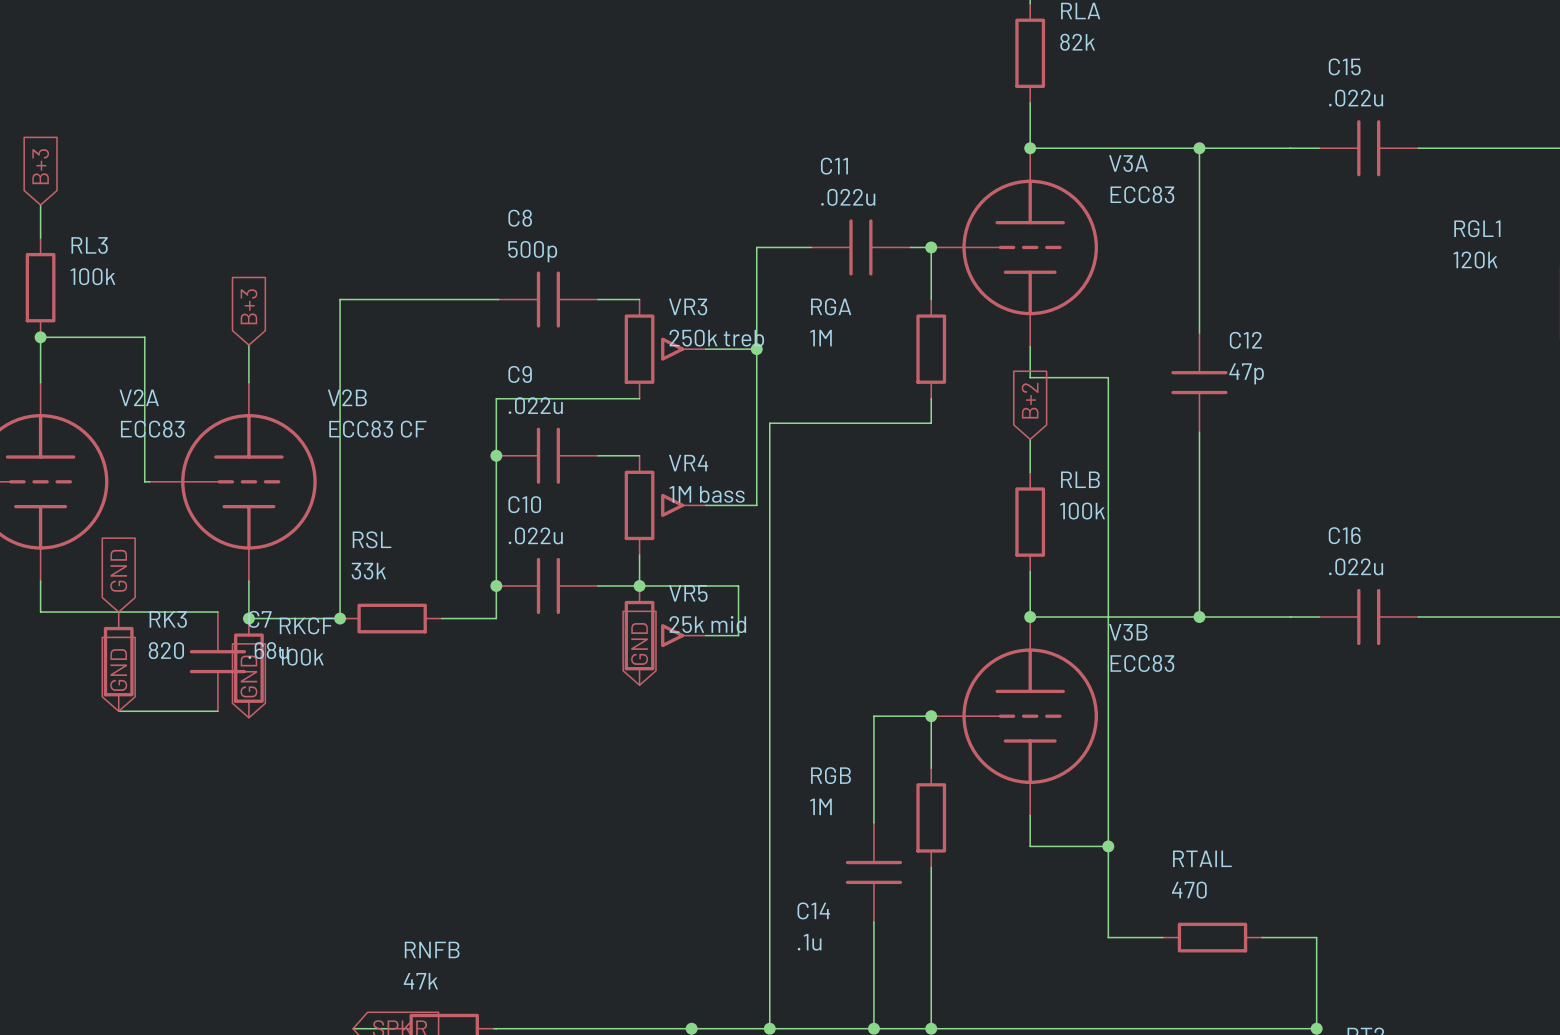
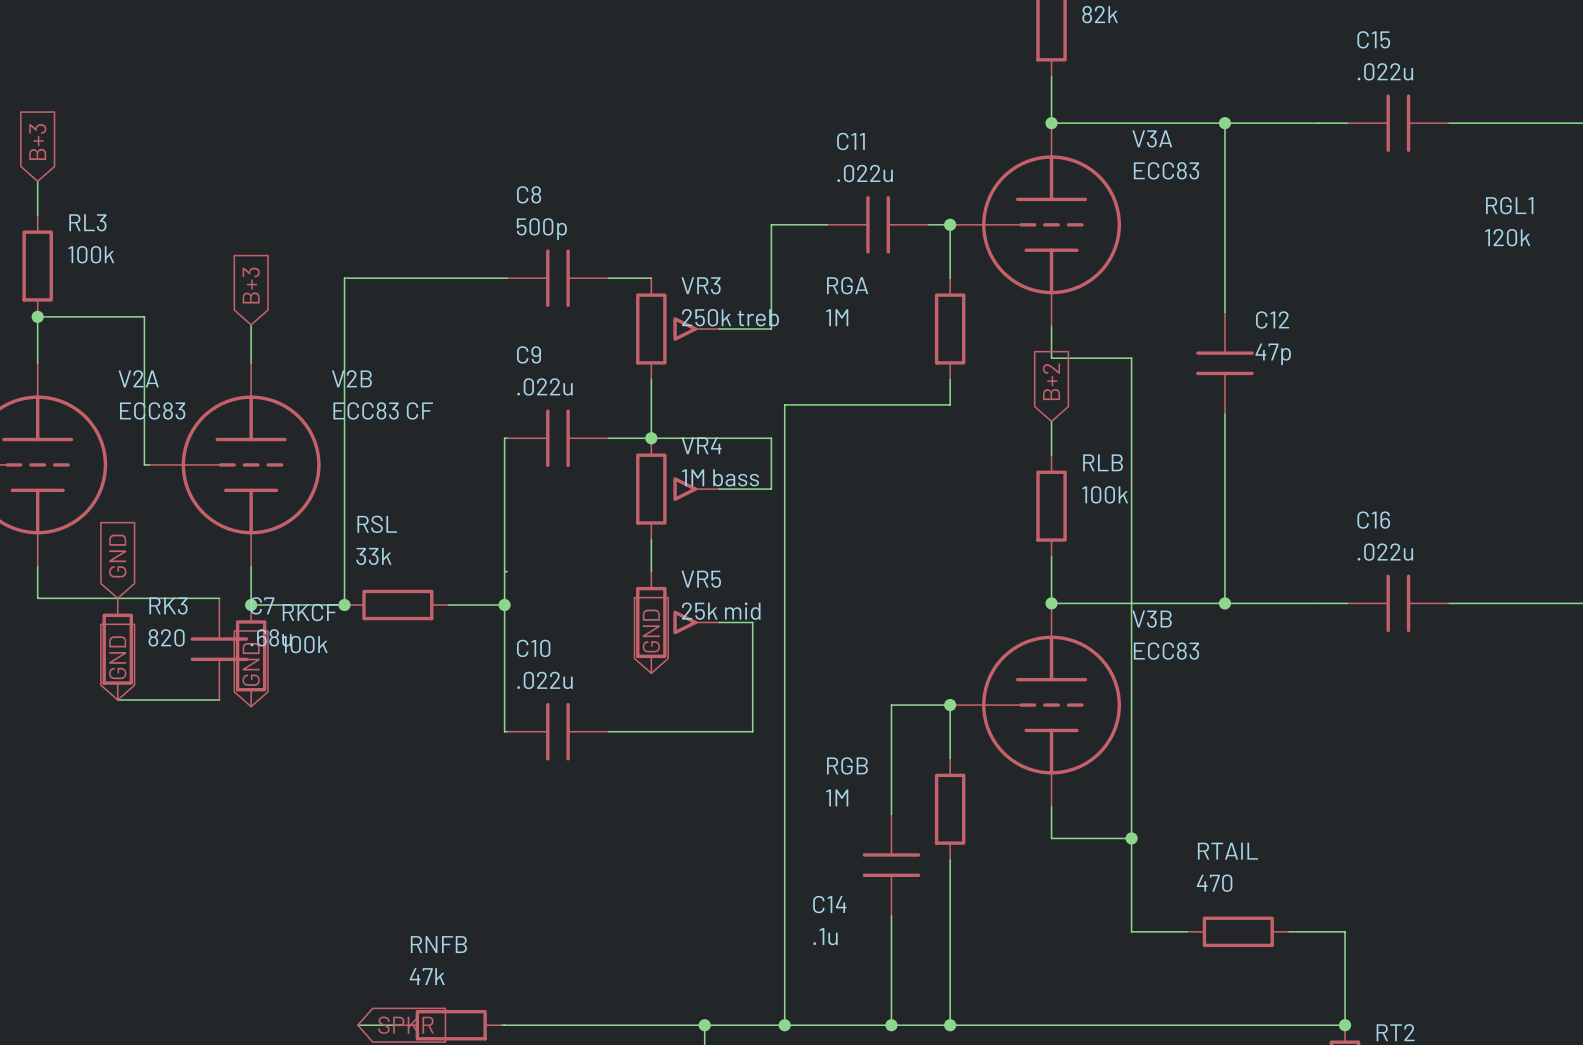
wire: (756, 349) (756, 455) -> (651, 379) (651, 438) (771, 438)
junction: (756, 349) -> none
wire: (639, 398) (496, 398) (496, 455) -> none
junction: (496, 455) -> none
junction: none -> (651, 438)
junction position: (496, 586) -> (504, 605)
C10 position: (548, 586) -> (557, 731)
wire: (598, 586) (738, 586) (738, 635) -> (608, 731) (752, 731) (752, 622)
junction: (639, 586) -> none
wire: none -> (504, 605) (504, 731) (507, 731)

